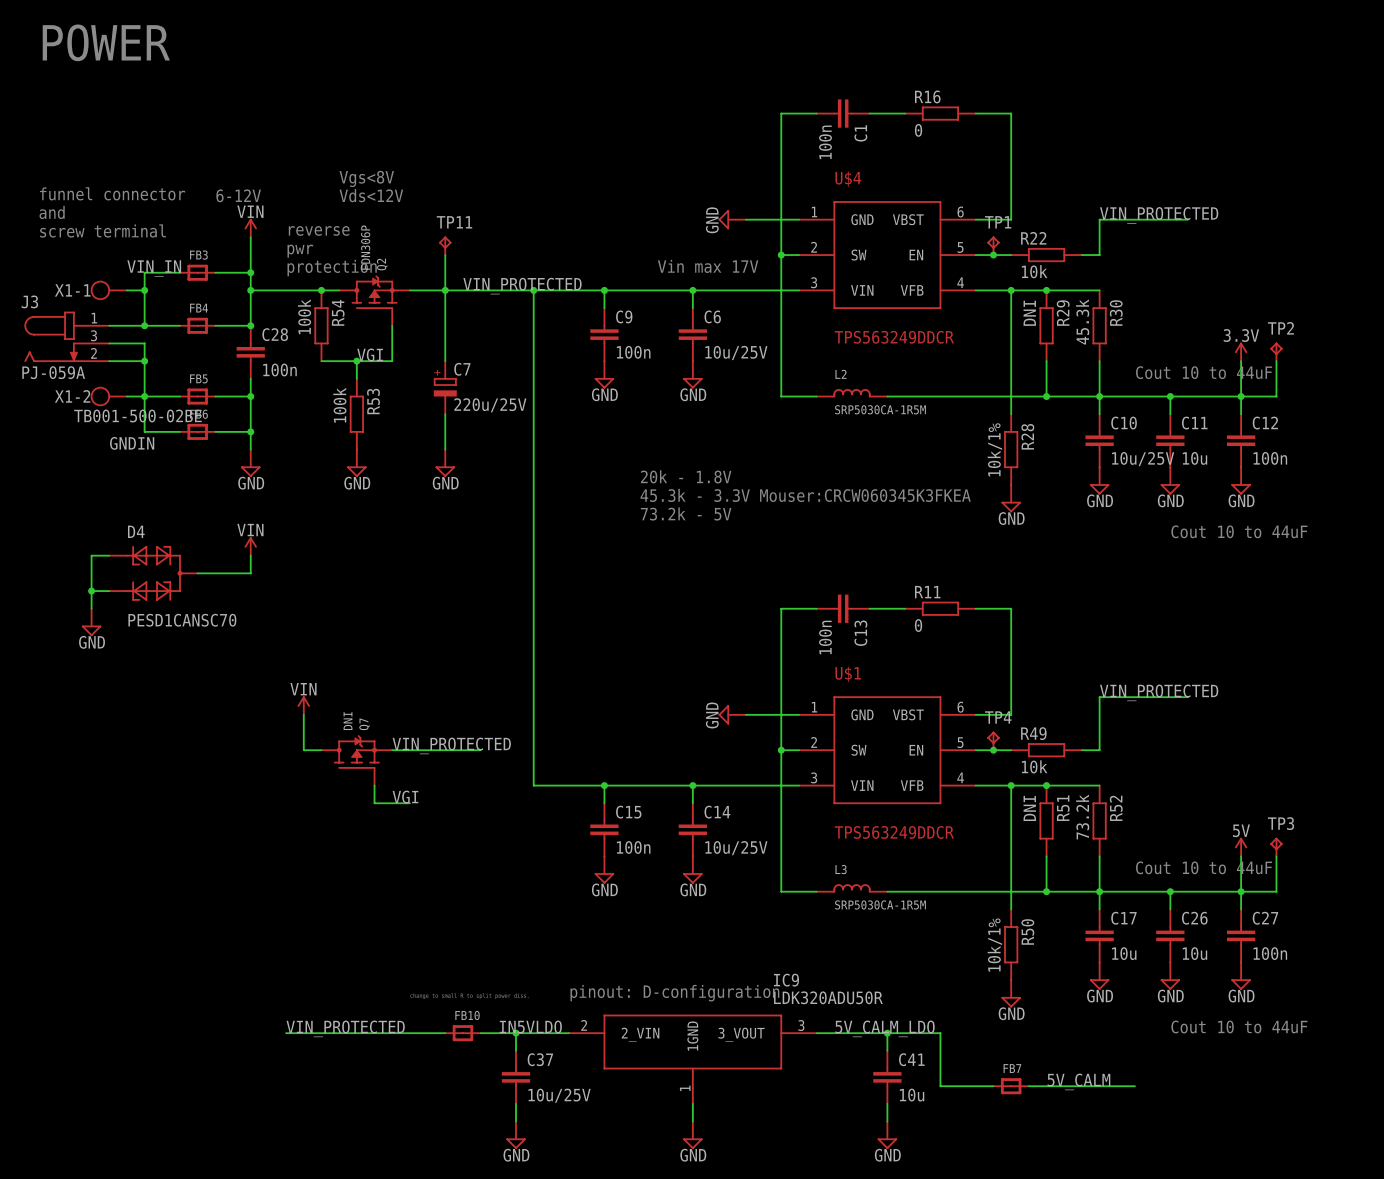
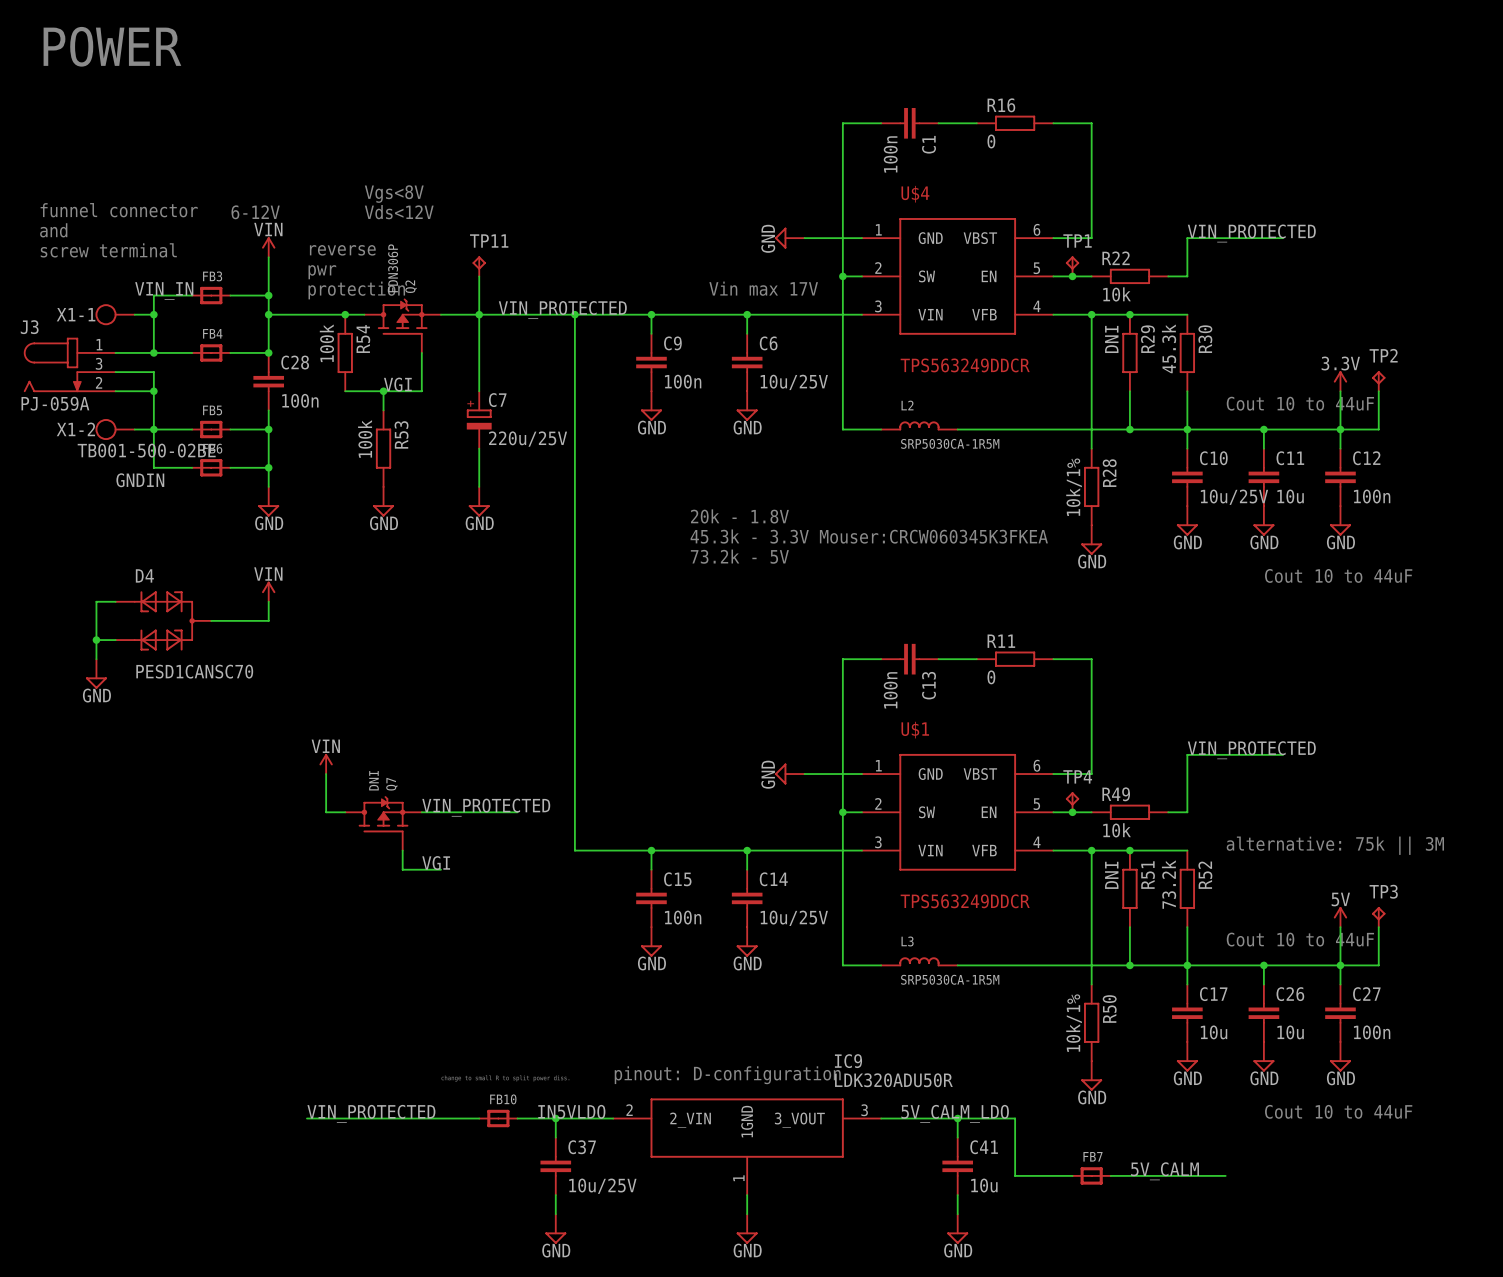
text: none -> alternative: 75k || 3M (1335, 845)

